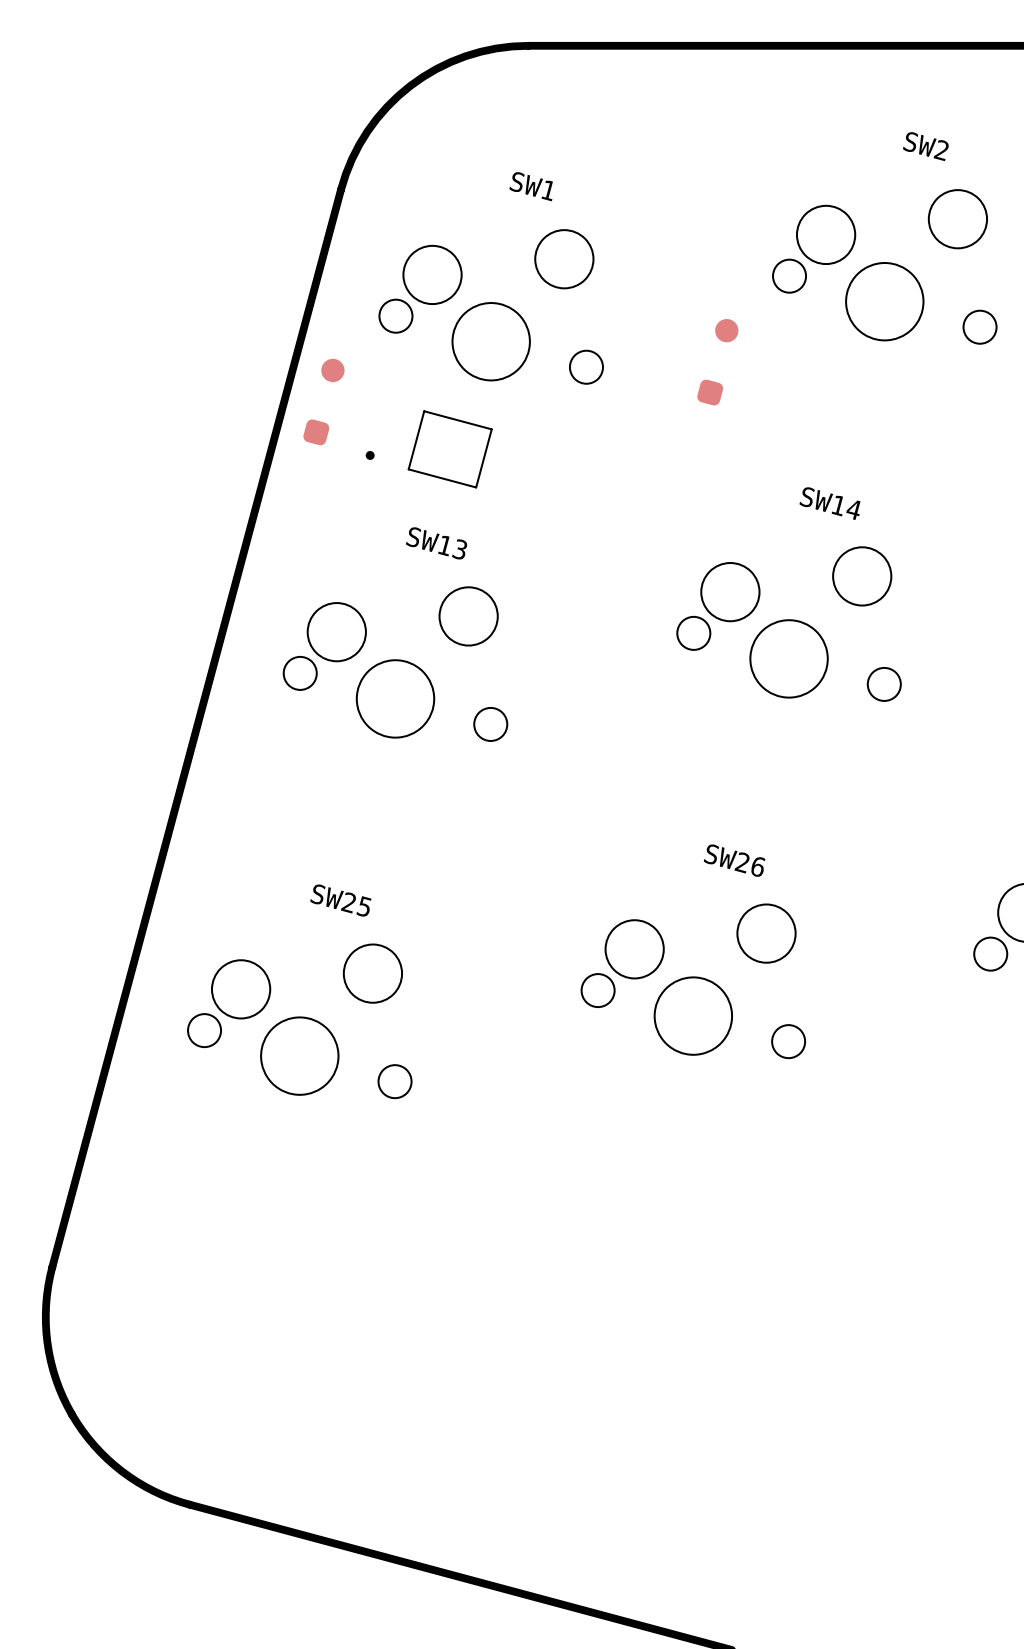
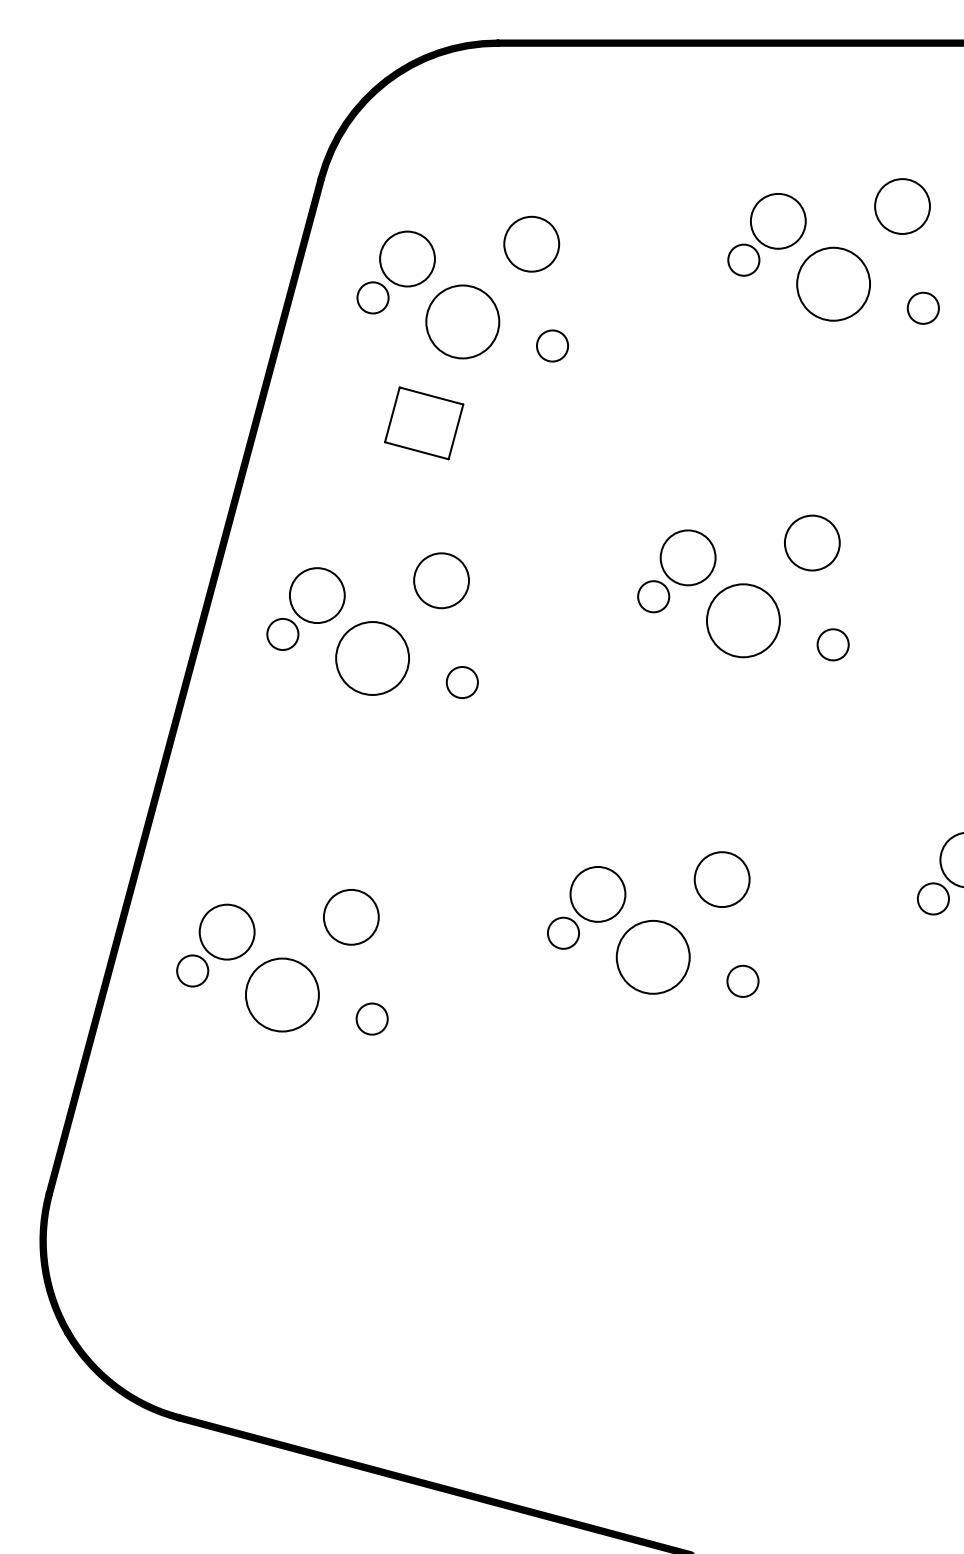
SW2 name: SW2 (926, 146) -> none
SW1 name: SW1 (531, 186) -> none
part: (717, 362) -> none
part: (323, 402) -> none
part: (429, 449) -> none
SW14 name: SW14 (829, 503) -> none
SW13 name: SW13 (436, 543) -> none
SW26 name: SW26 (734, 860) -> none
SW25 name: SW25 (340, 900) -> none

